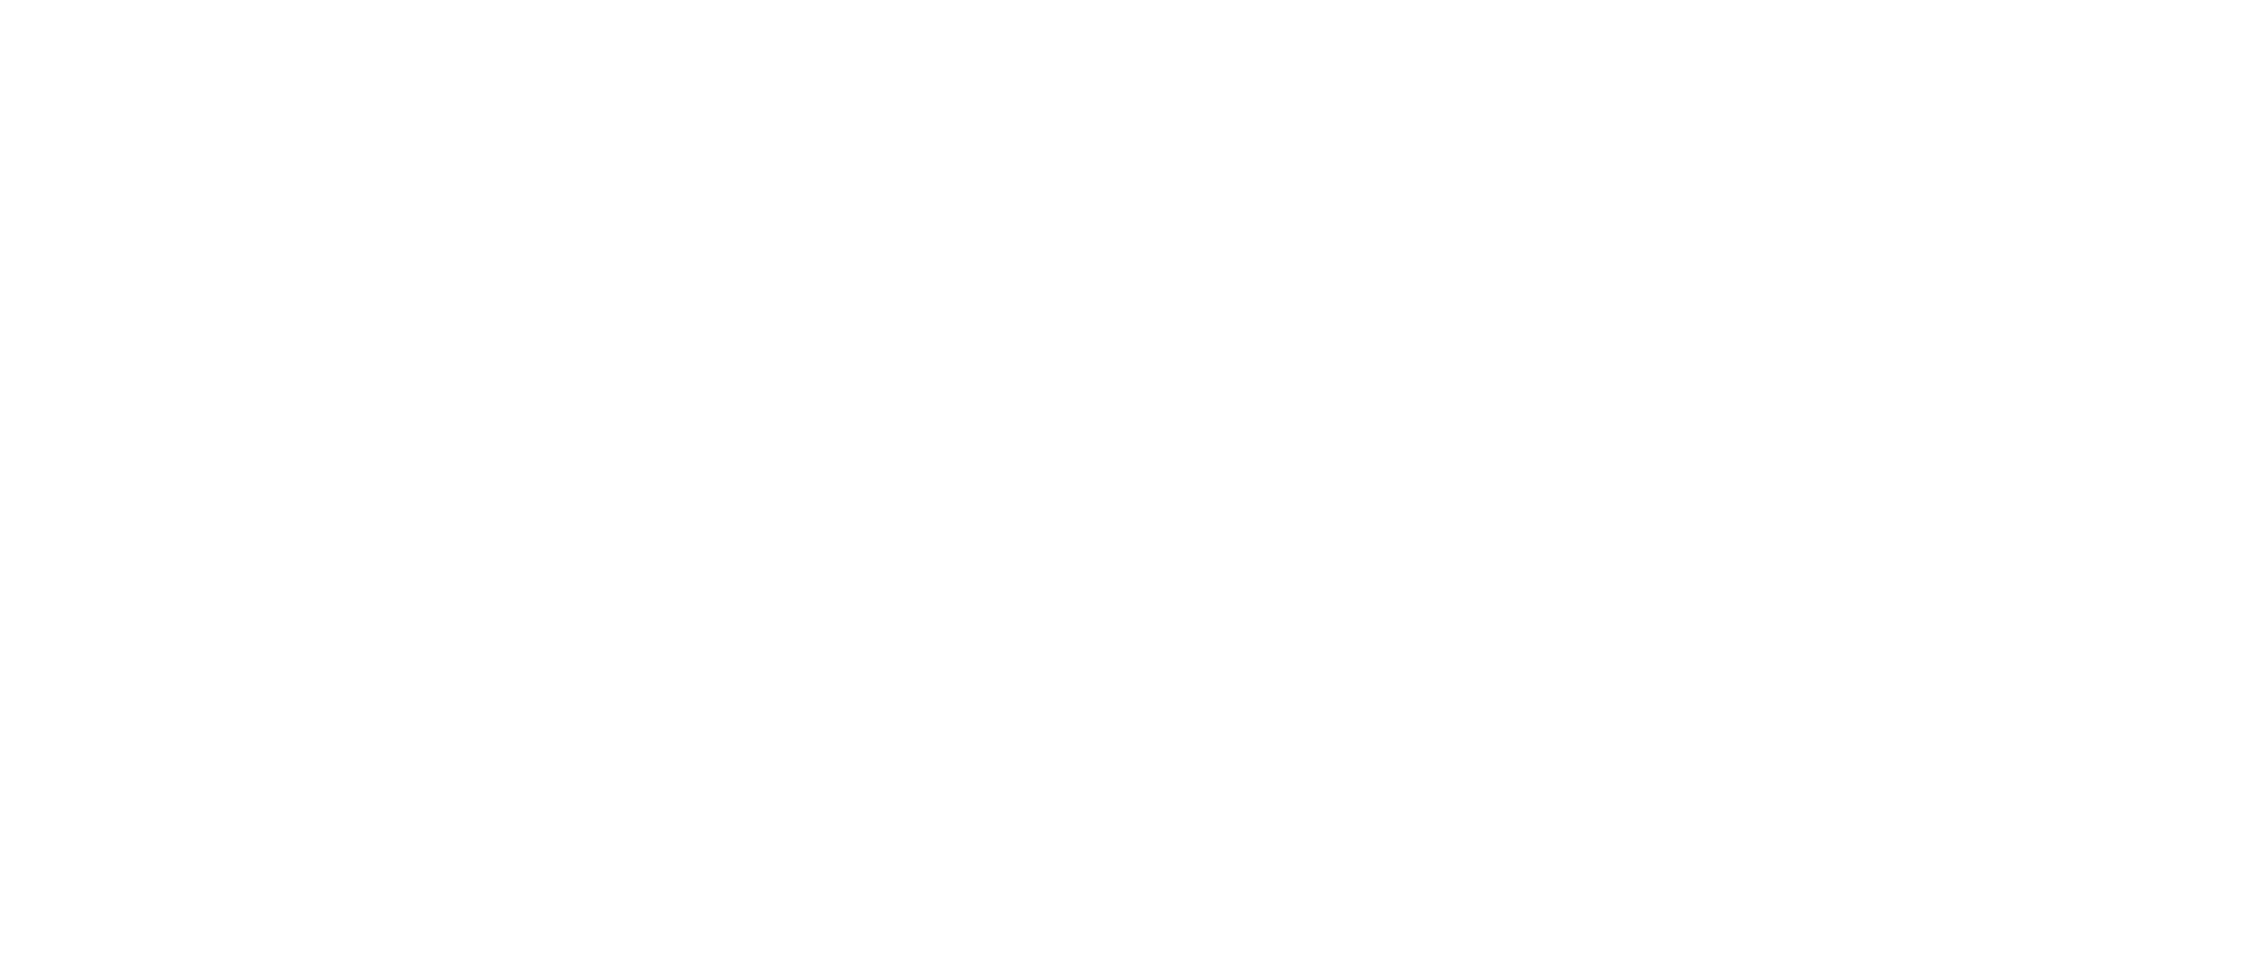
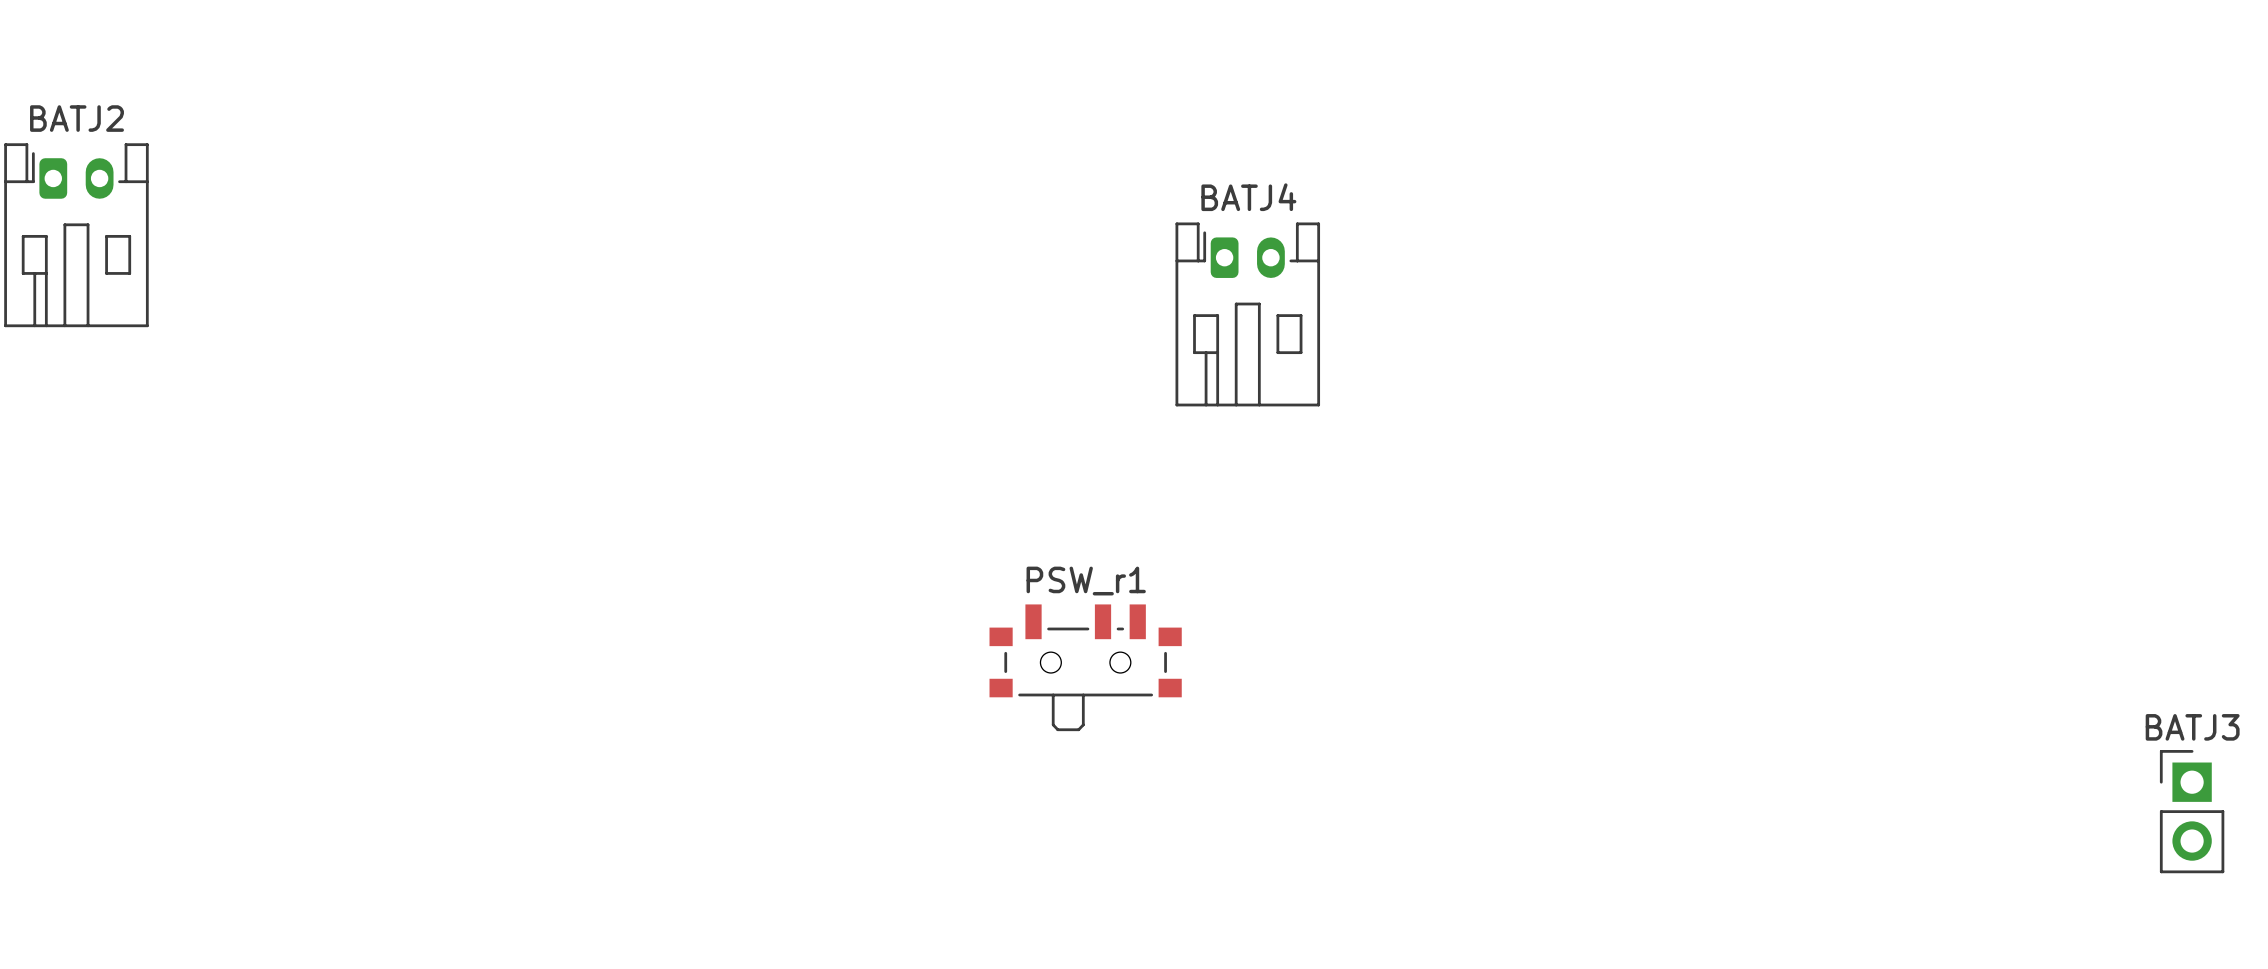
BATJ2: none -> (76, 235)
BATJ4: none -> (1247, 314)
PSW_r1: none -> (1085, 667)
BATJ3: none -> (2192, 811)

